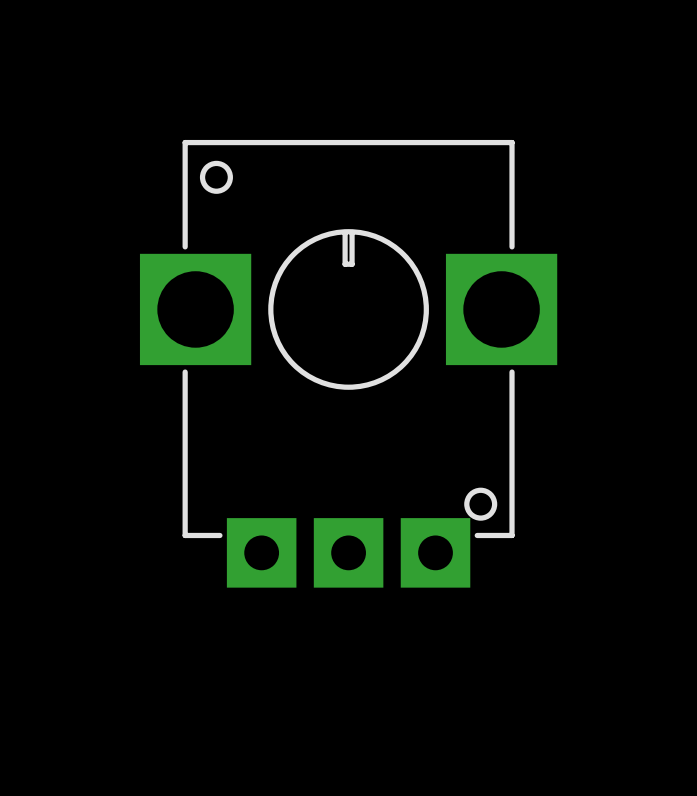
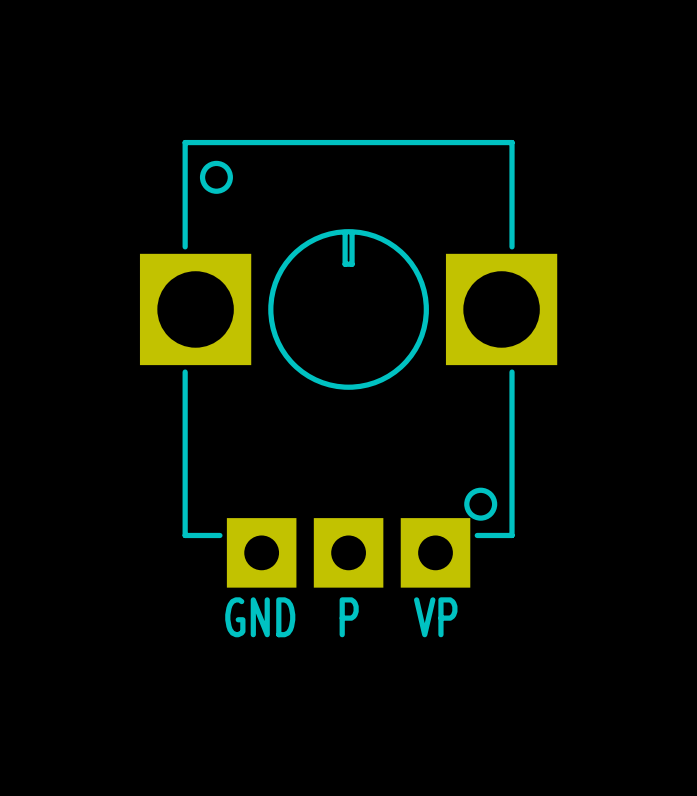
text: none -> GND (260, 617)
text: none -> P (349, 617)
text: none -> VP (435, 617)

